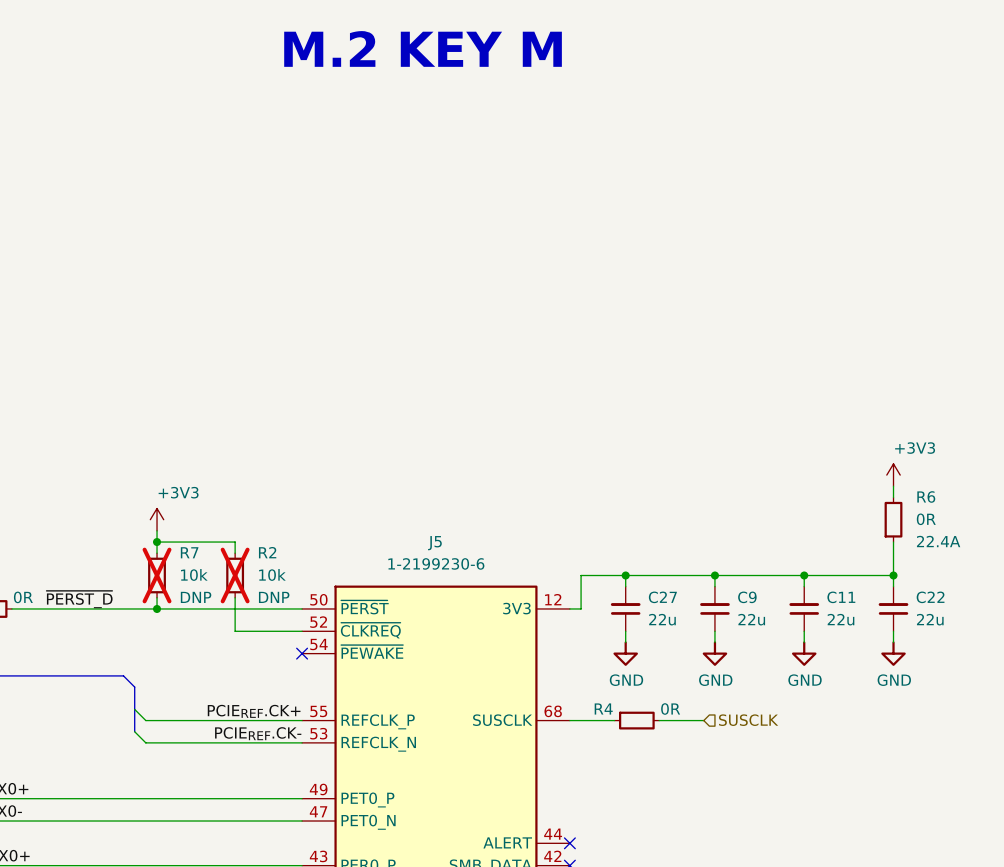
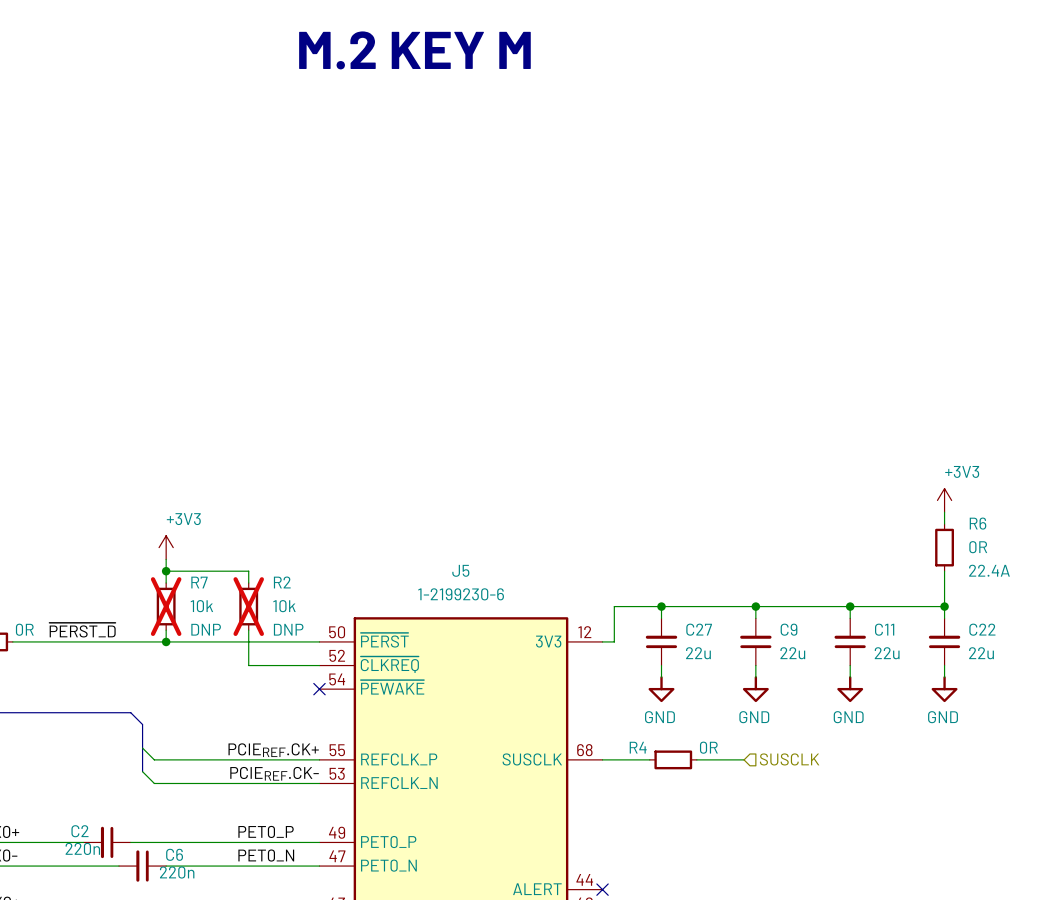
label: none -> PET0_P (266, 831)
C2: none -> (107, 842)
label: none -> PET0_N (266, 855)
C6: none -> (142, 866)

